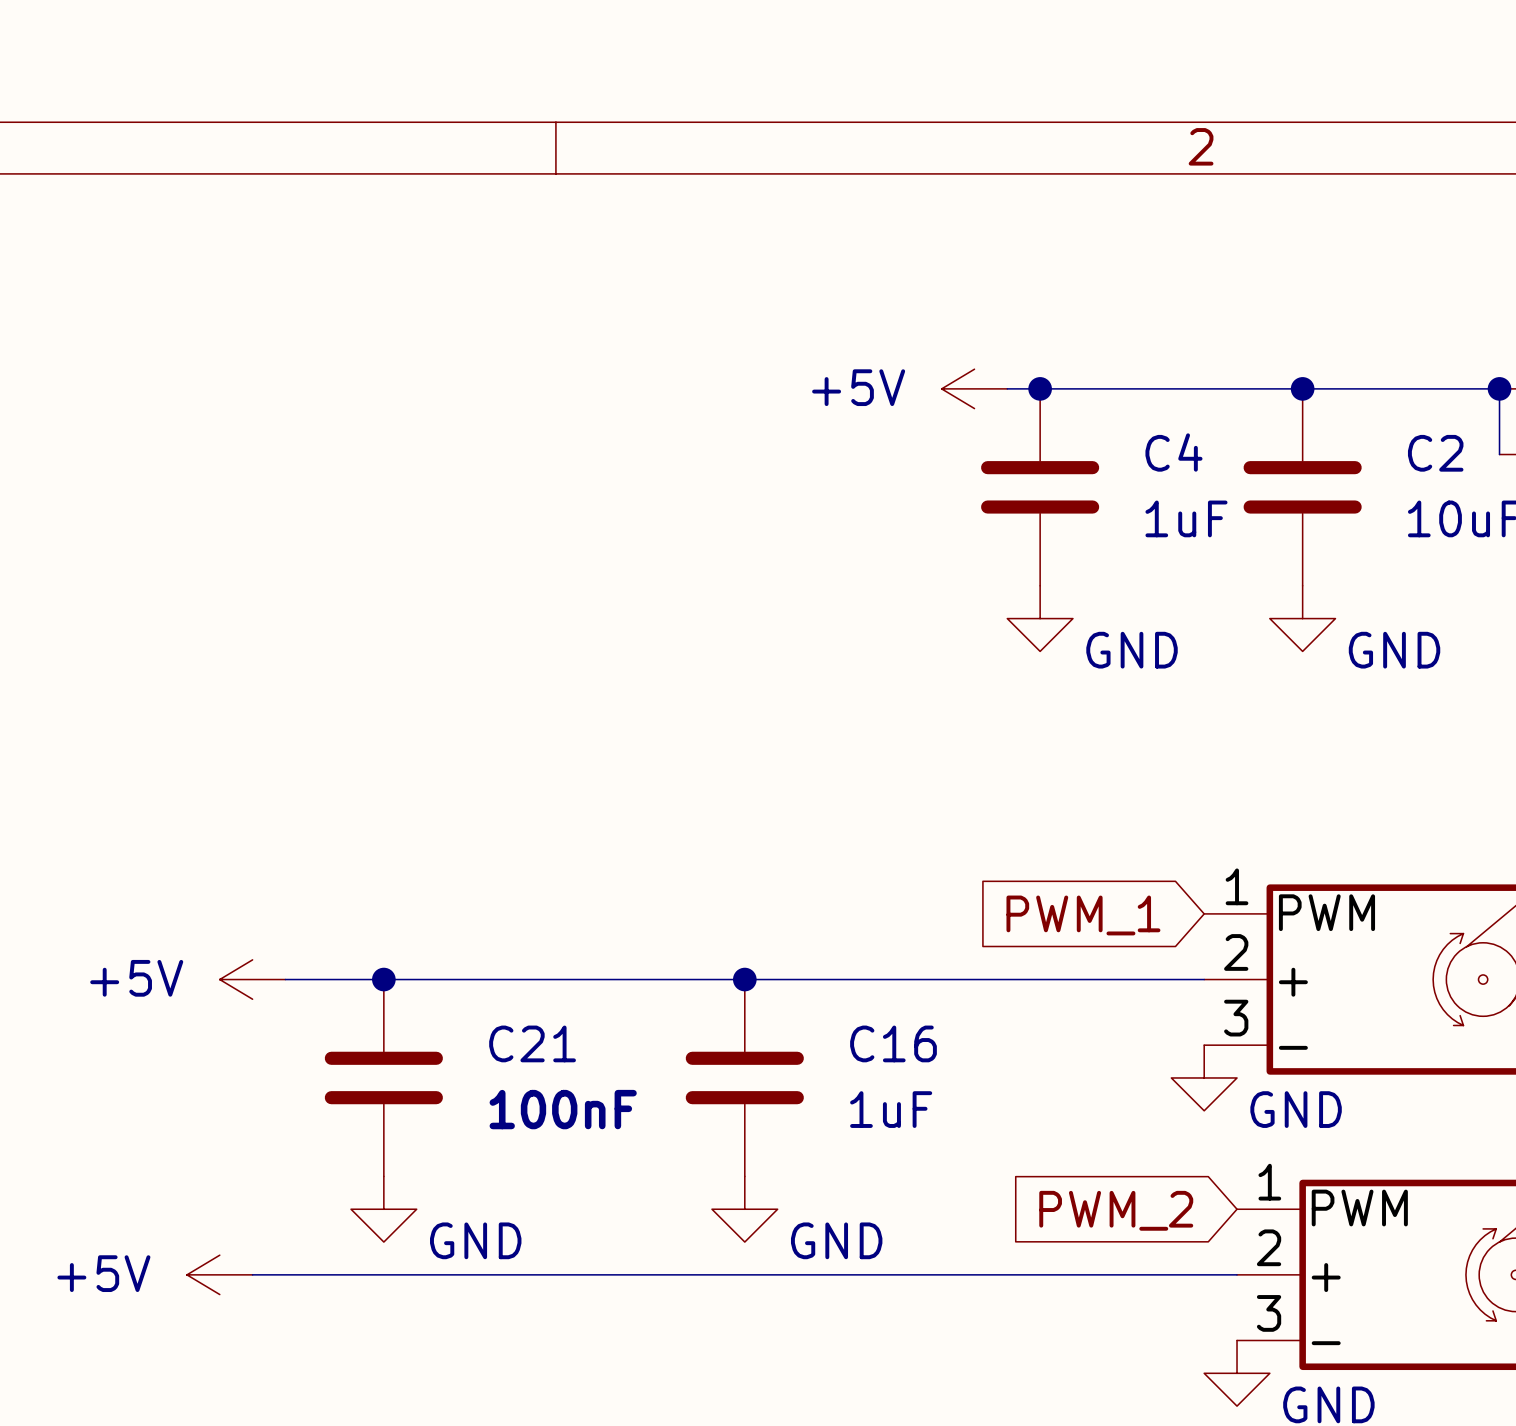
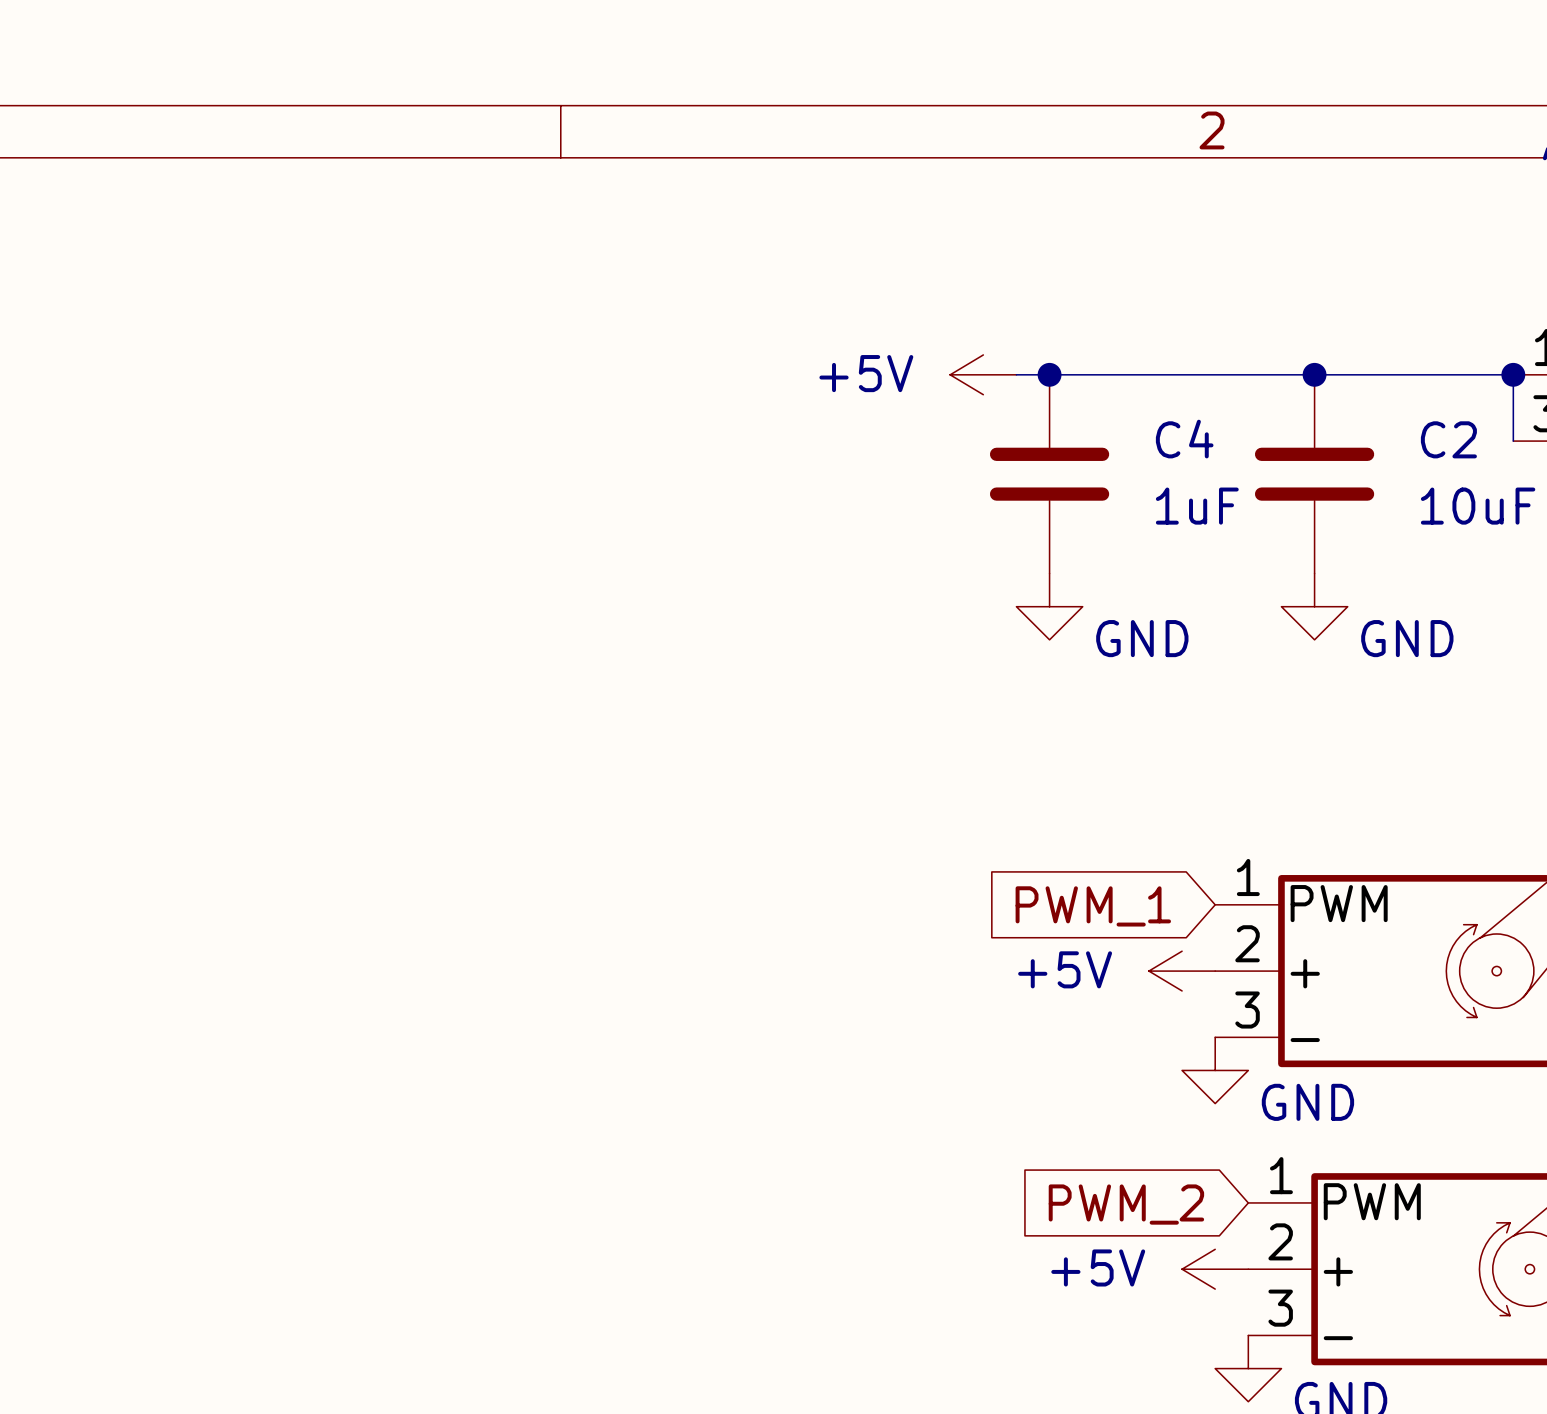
power symbol: +5V (252, 979) -> none
wire: (285, 979) (1204, 979) -> none
junction: (383, 979) -> none
junction: (744, 979) -> none
power symbol: none -> +5V (1182, 971)
C21: 100nF (383, 1077) -> none
C16: 1uF (744, 1077) -> none
power symbol: GND (383, 1209) -> none
power symbol: GND (744, 1209) -> none
power symbol: +5V (219, 1274) -> none
wire: (252, 1274) (1237, 1274) -> none
power symbol: none -> +5V (1215, 1269)

